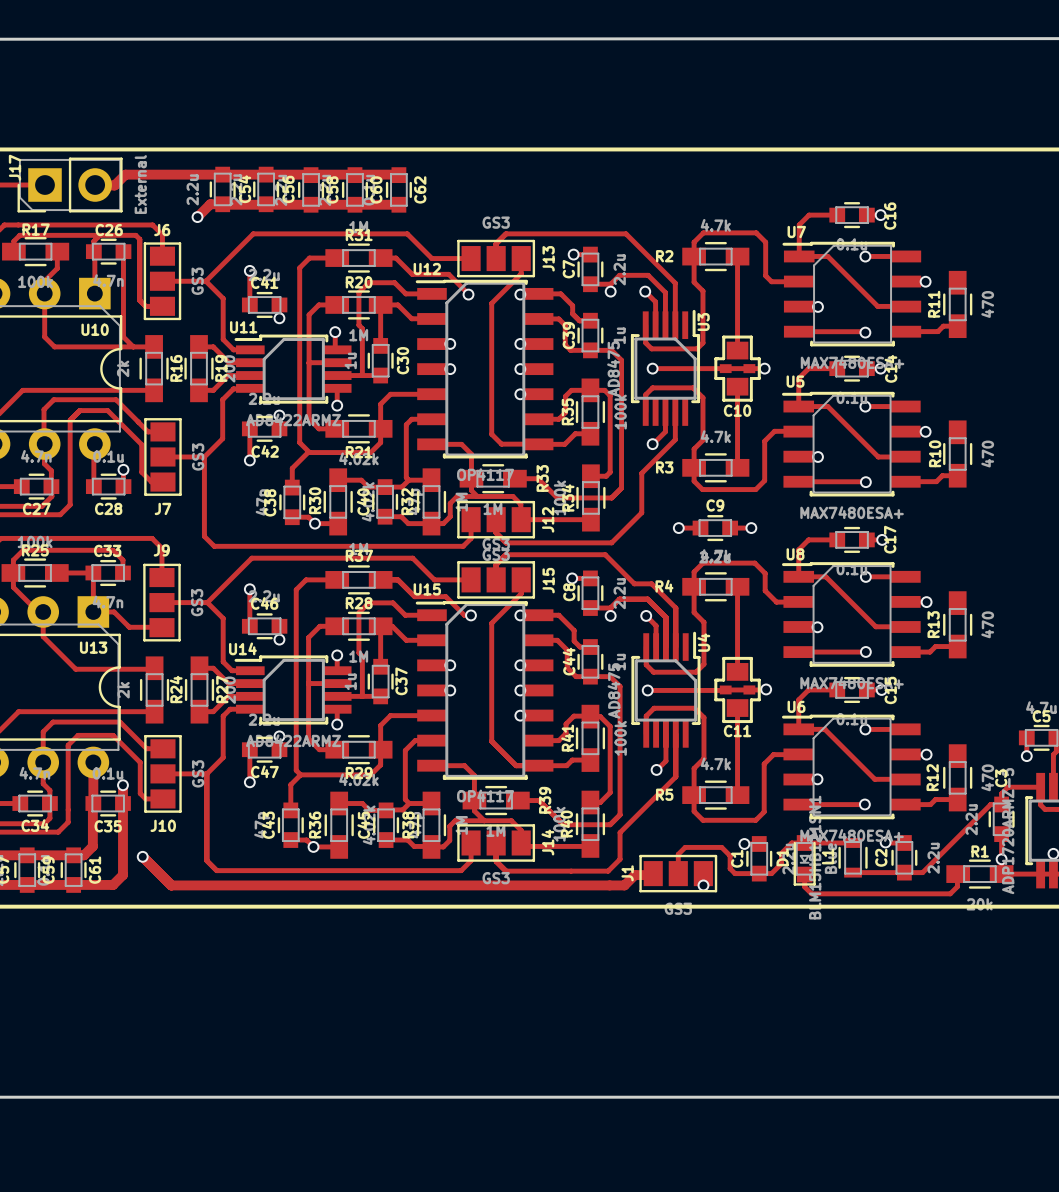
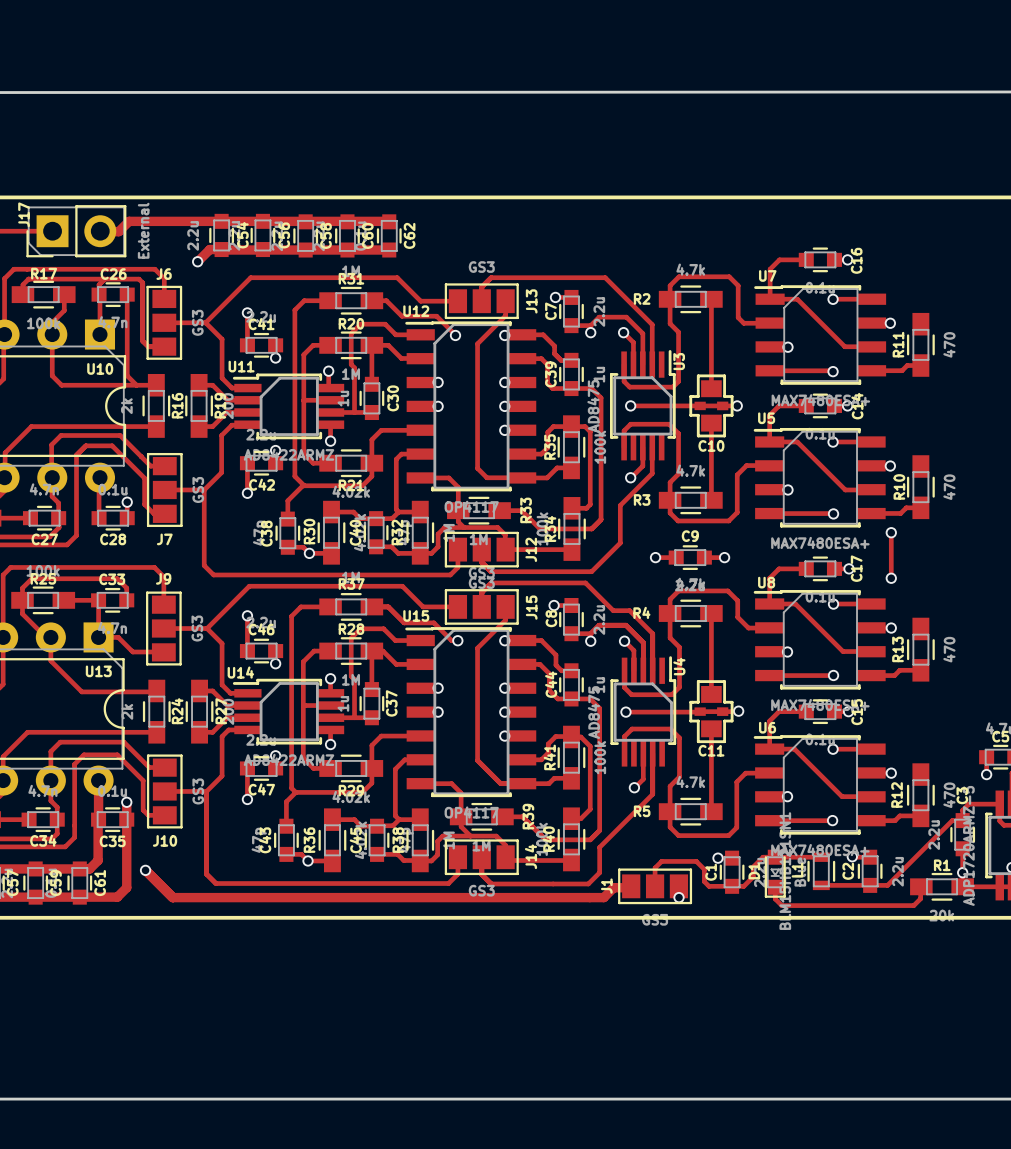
track: none -> (891, 532) (891, 578)
via: none -> (891, 532)
via: none -> (891, 578)

